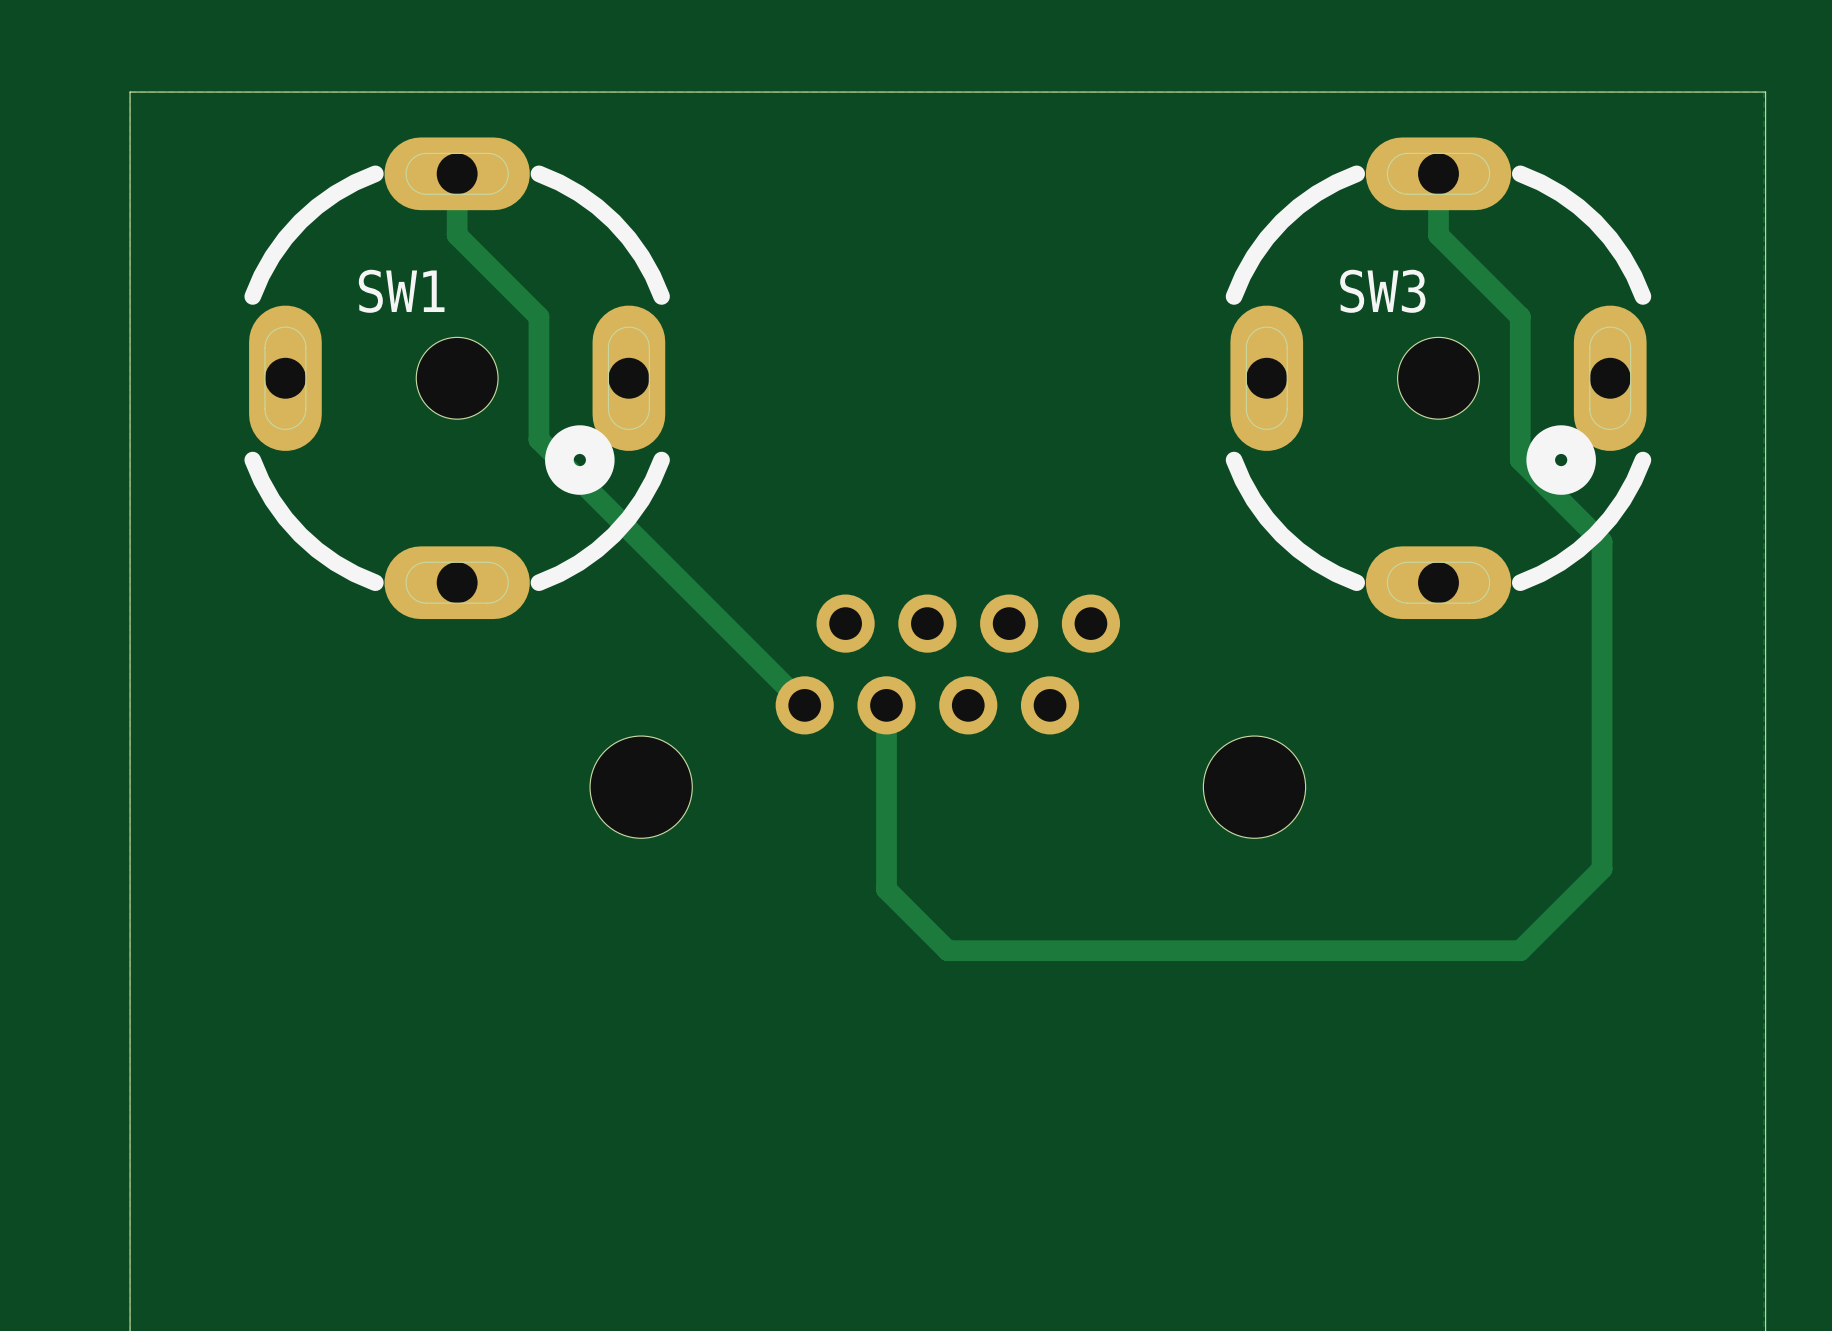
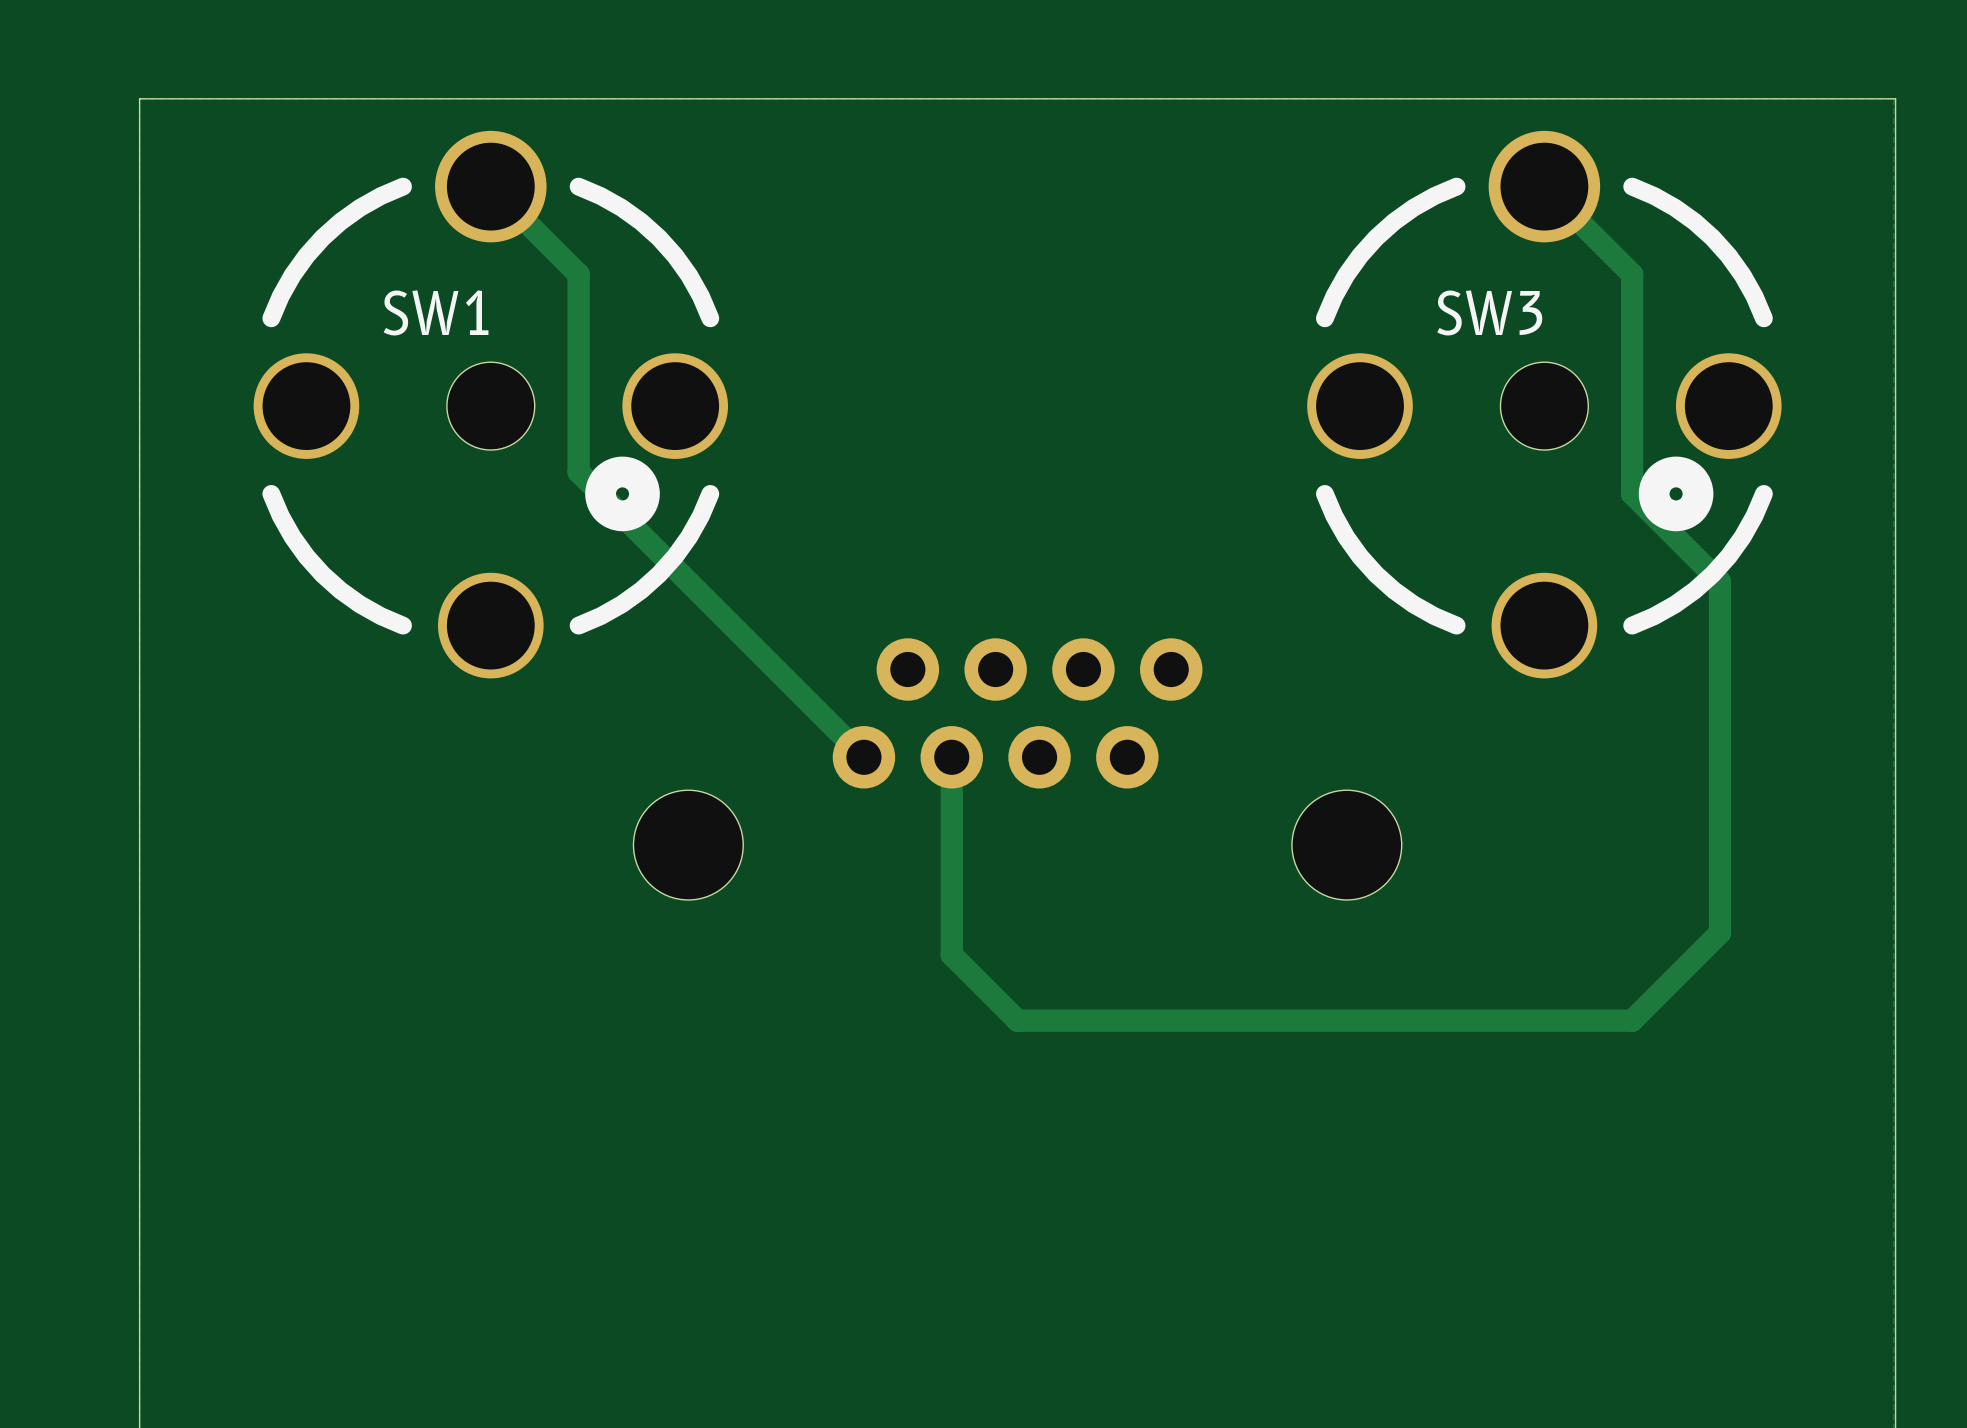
SW1 footprint: [244, 137, 670, 620] -> [253, 130, 729, 679]
SW3 footprint: [1225, 137, 1652, 620] -> [1307, 130, 1782, 679]
track: (457, 173) (457, 235) (538, 316) -> (490, 186) (578, 274) (578, 340)
track: (1438, 173) (1438, 235) (1520, 316) -> (1544, 186) (1632, 274) (1632, 340)

